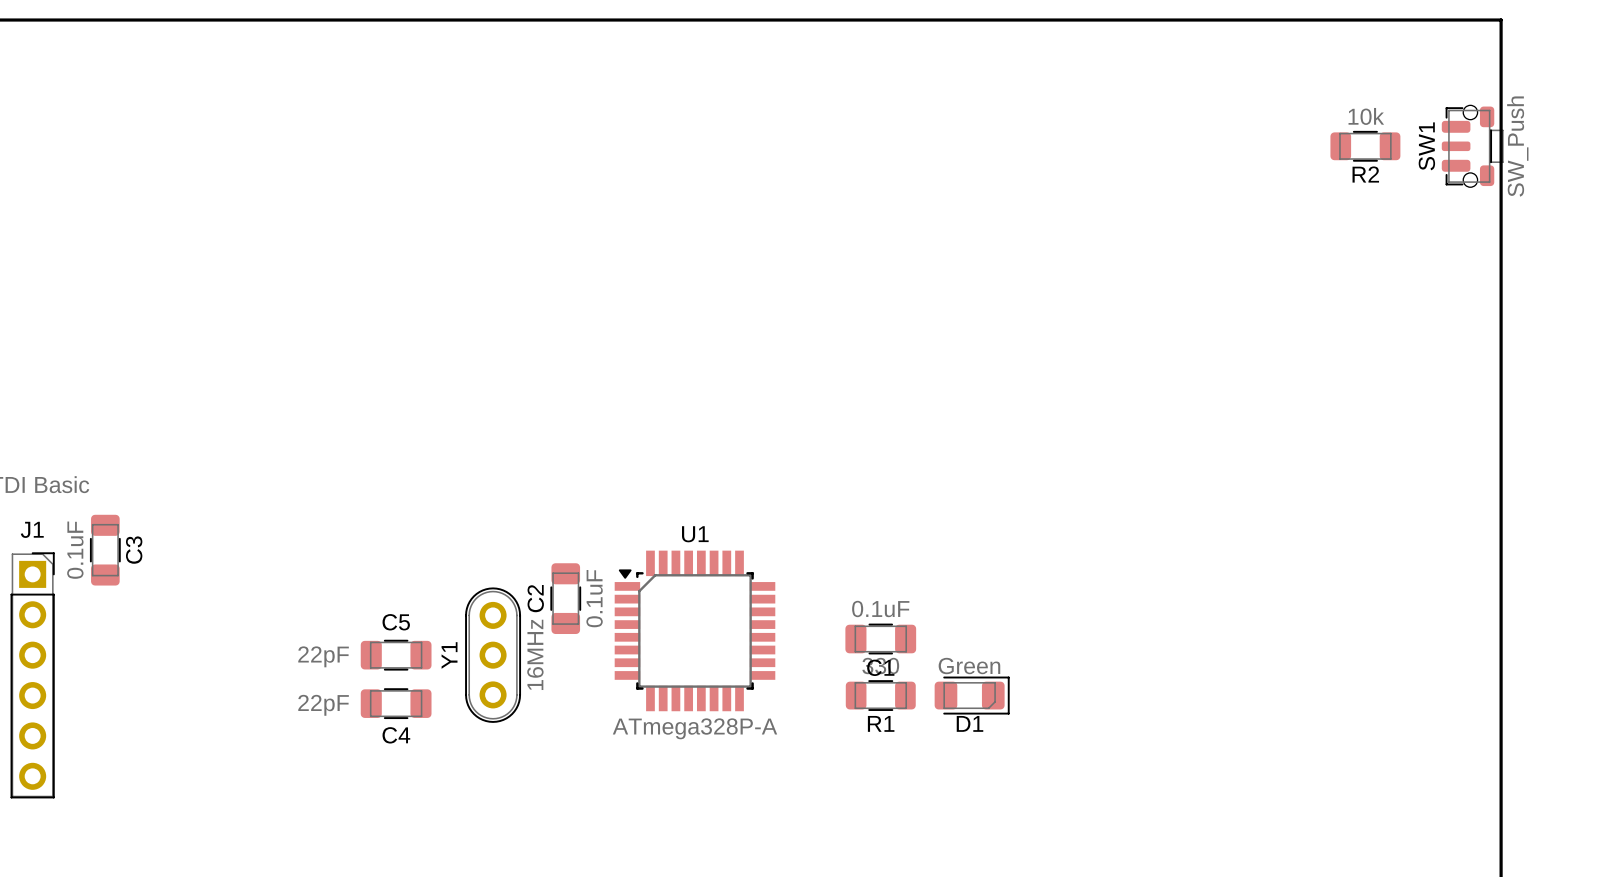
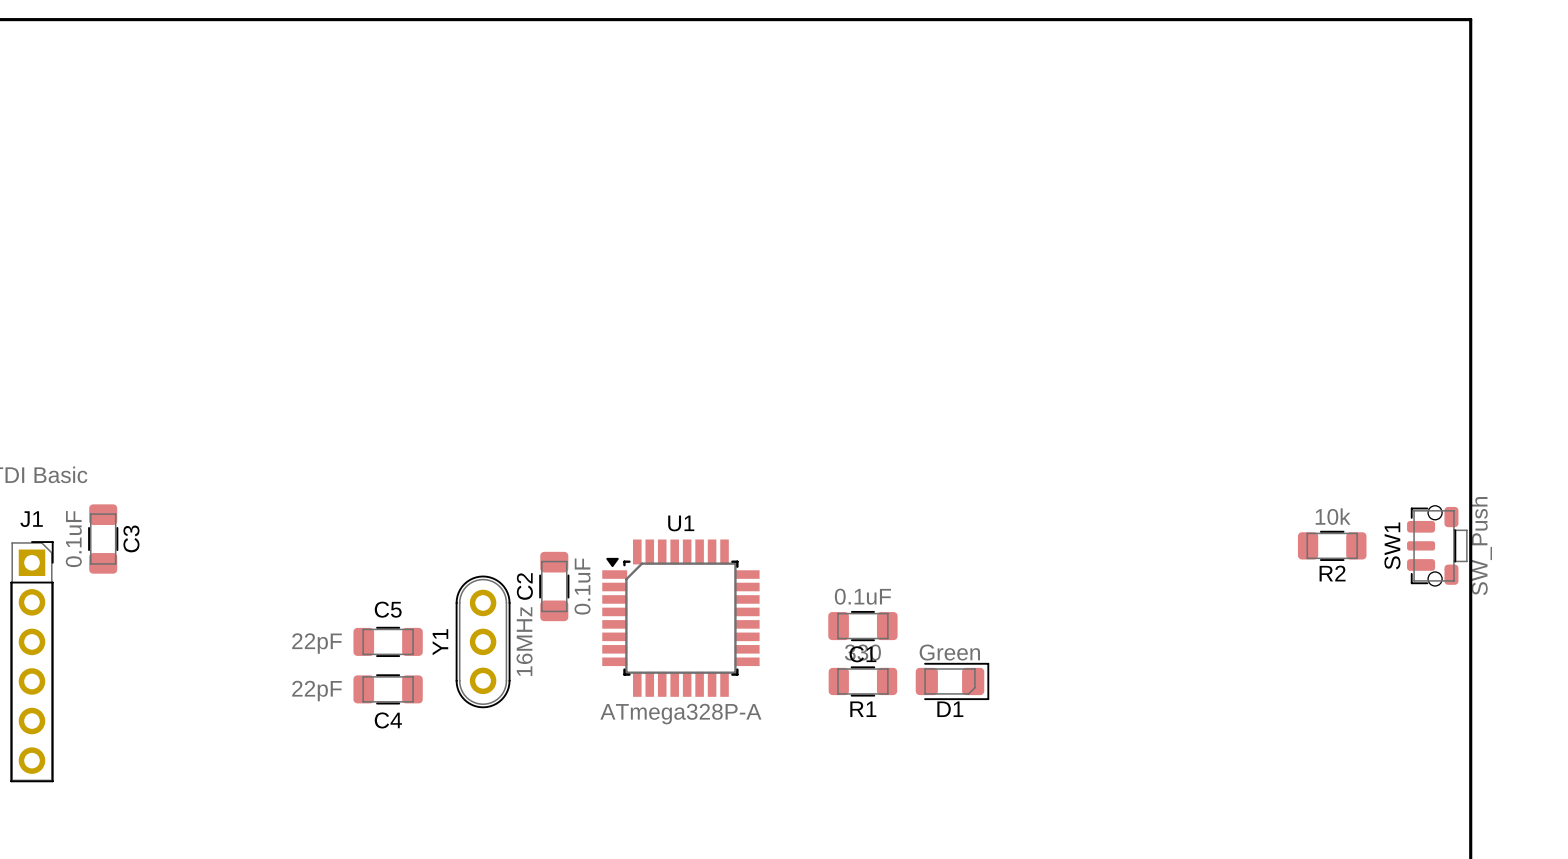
R2 position: (1365, 146) -> (1332, 545)
SW1 position: (1472, 146) -> (1437, 545)

